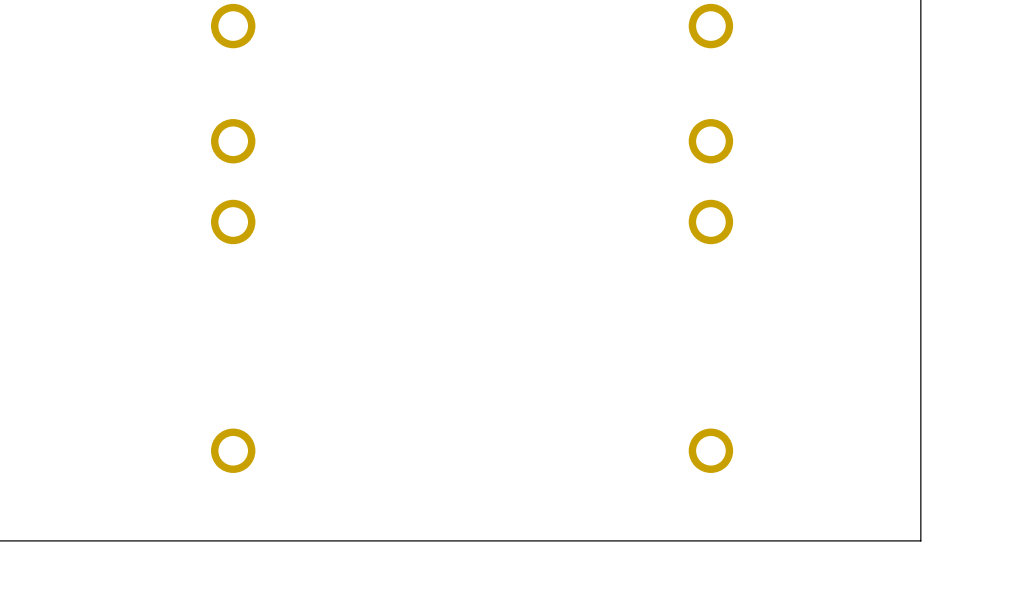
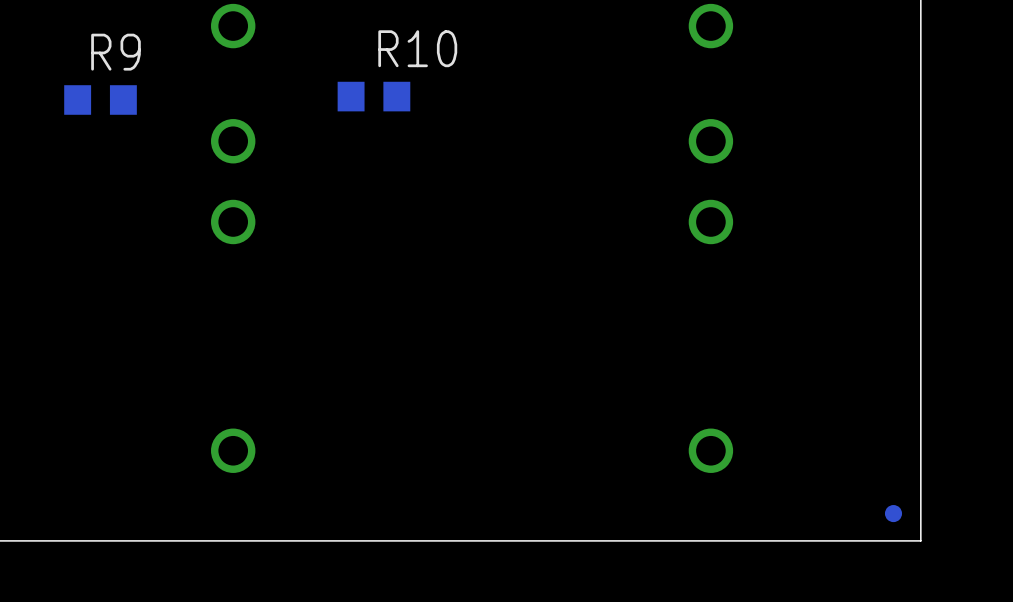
R10: none -> (373, 96)
R9: none -> (100, 99)
part: none -> (893, 513)

